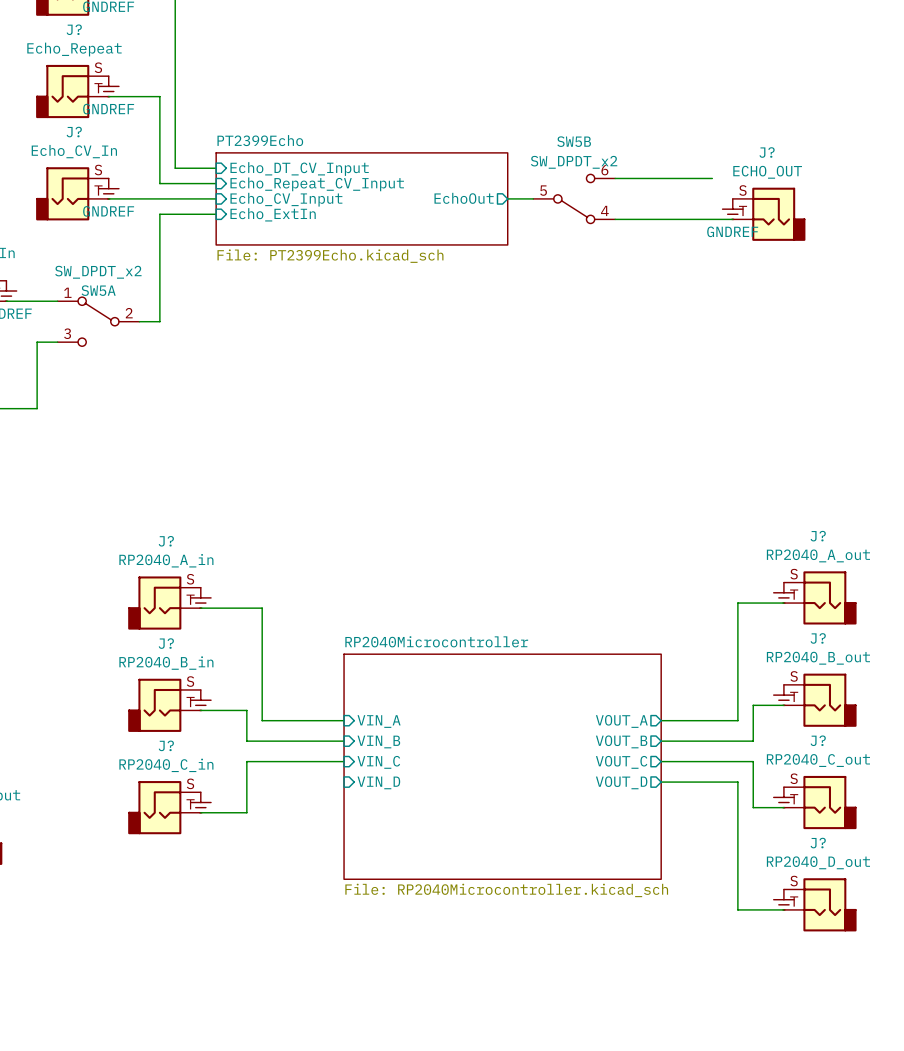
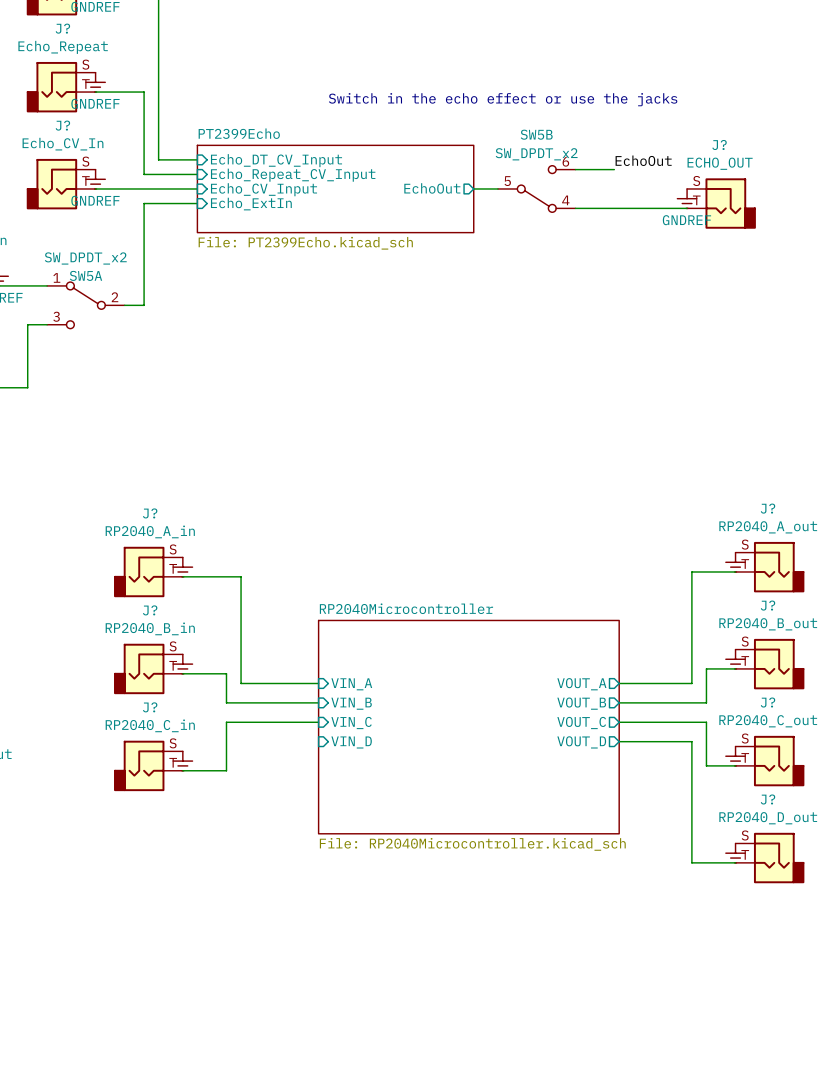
text: none -> Switch in the echo effect or use the jacks (503, 99)
label: none -> EchoOut (643, 160)
wire: (656, 178) (712, 178) -> none

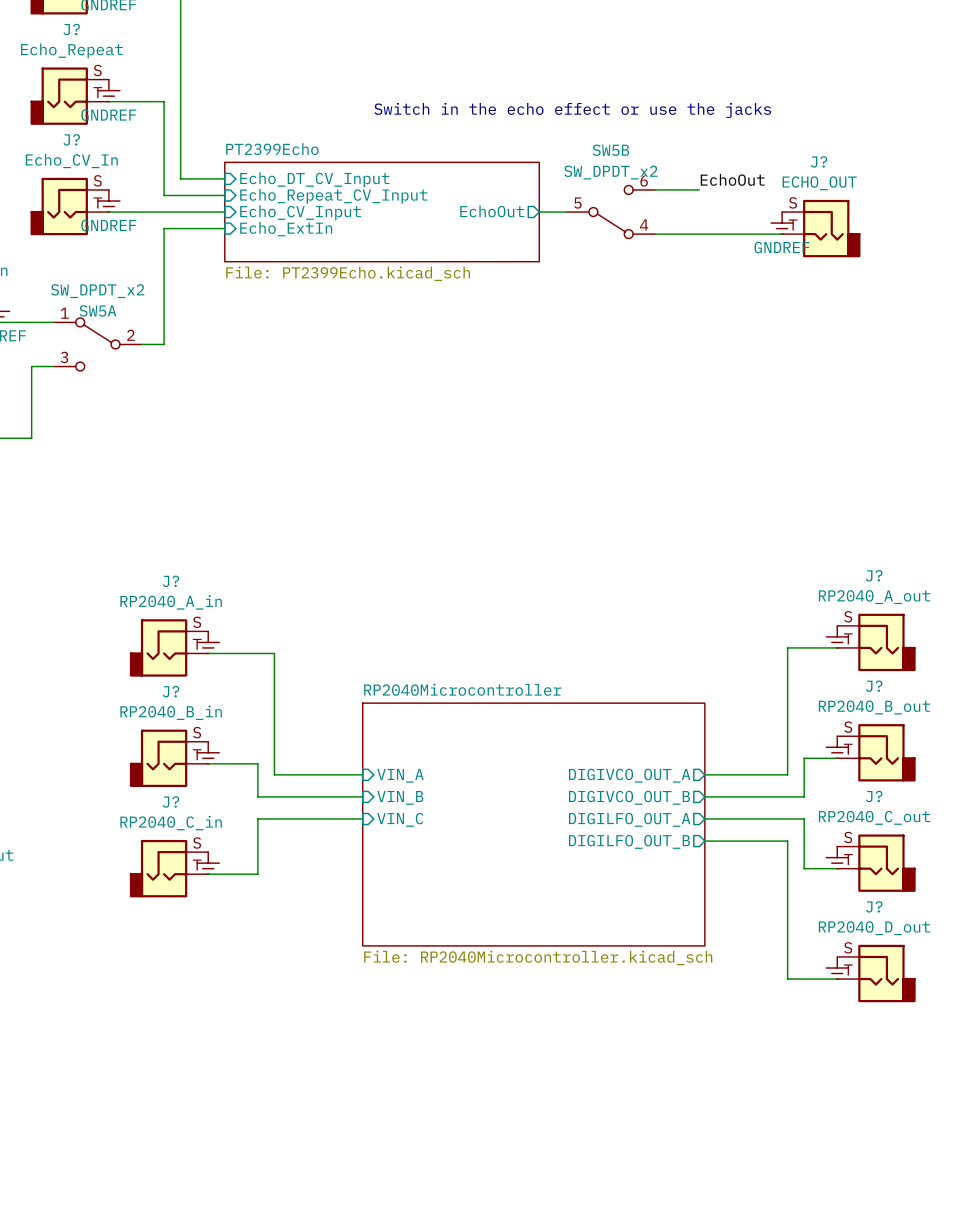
sheet pin: VOUT_A (581, 684) -> DIGIVCO_OUT_A (629, 775)
sheet pin: VOUT_B (581, 703) -> DIGIVCO_OUT_B (629, 797)
sheet pin: VOUT_C (581, 723) -> DIGILFO_OUT_A (629, 819)
sheet pin: VIN_D (351, 742) -> none
sheet pin: VOUT_D (581, 742) -> DIGILFO_OUT_B (629, 841)

